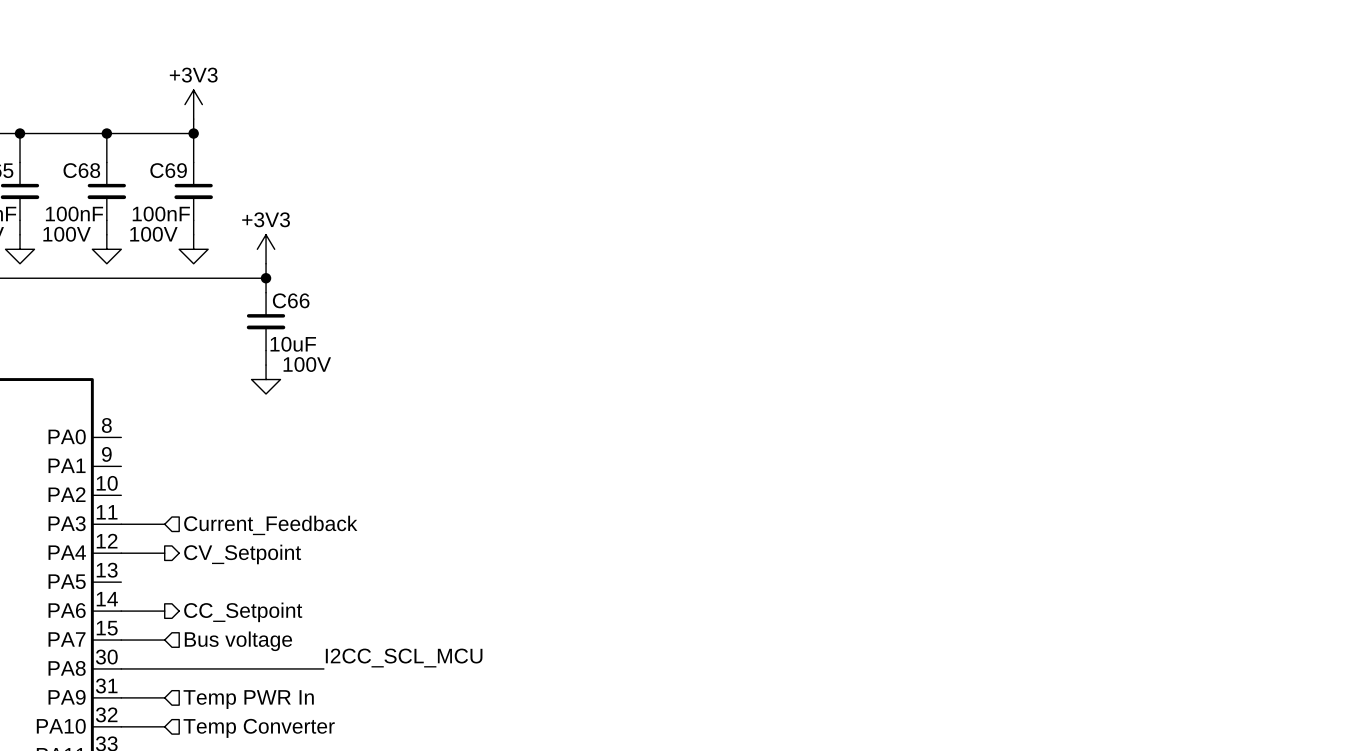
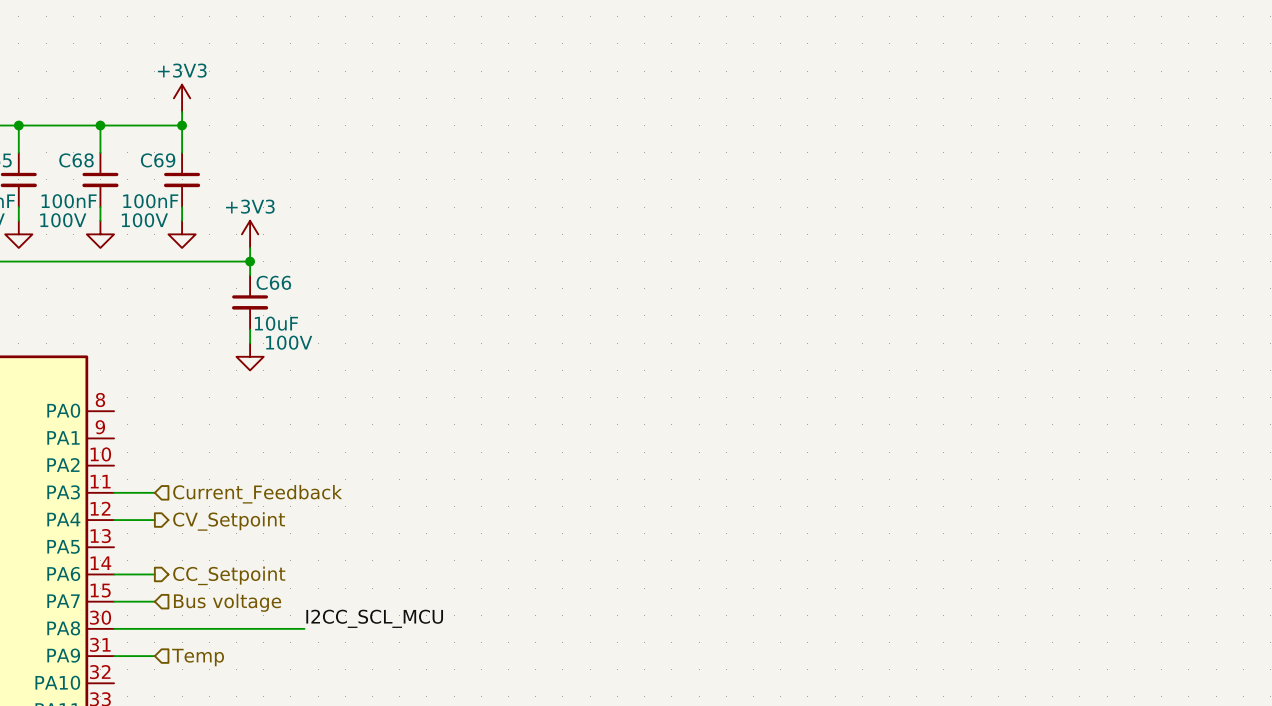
hierarchical label: Temp PWR In (248, 699) -> Temp (198, 657)
wire: (121, 726) (164, 726) -> none
hierarchical label: Temp Converter (259, 728) -> none

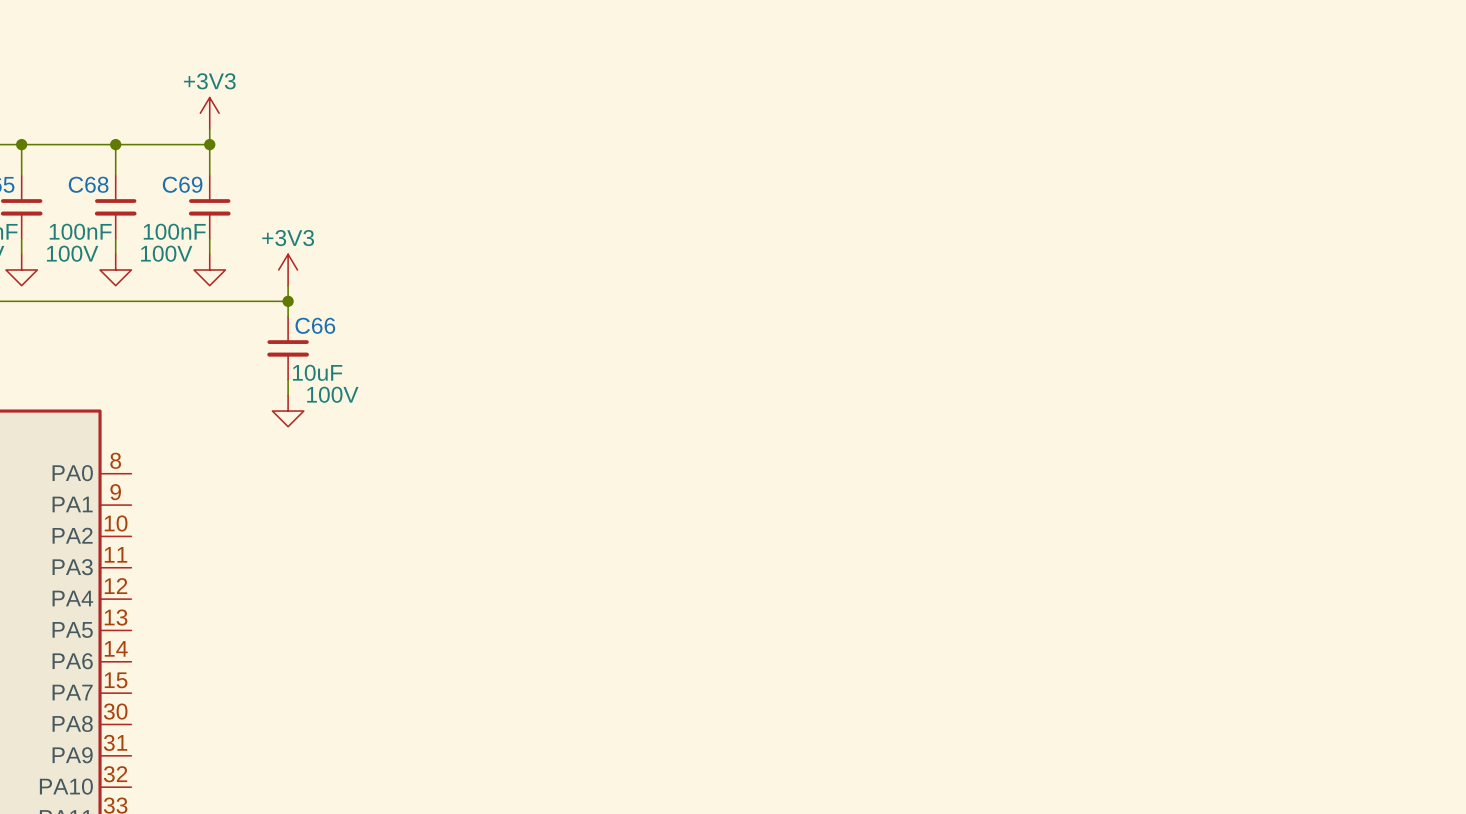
wire: (114, 492) (154, 492) -> none
hierarchical label: Current_Feedback (257, 494) -> none
wire: (114, 520) (154, 520) -> none
hierarchical label: CV_Setpoint (229, 521) -> none
wire: (114, 574) (154, 574) -> none
hierarchical label: CC_Setpoint (229, 575) -> none
wire: (114, 601) (154, 601) -> none
hierarchical label: Bus voltage (227, 602) -> none
label: I2CC_SCL_MCU (374, 618) -> none
wire: (114, 628) (304, 628) -> none
wire: (114, 656) (154, 656) -> none
hierarchical label: Temp (198, 657) -> none

